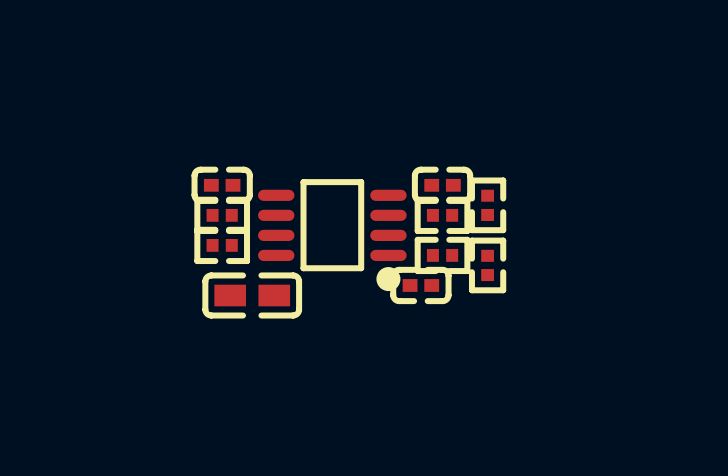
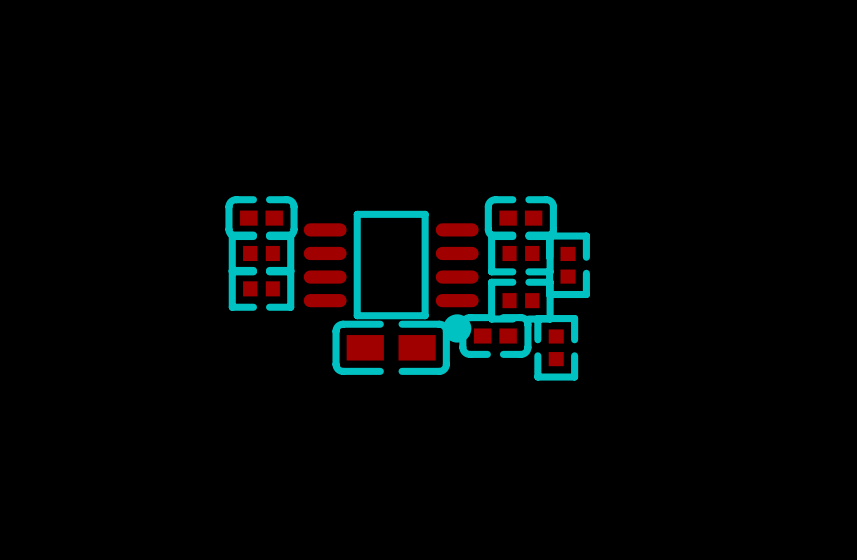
part: (487, 205) -> none
part: none -> (568, 265)
part: (487, 265) -> none
part position: (252, 295) -> (391, 347)
part: none -> (556, 347)

